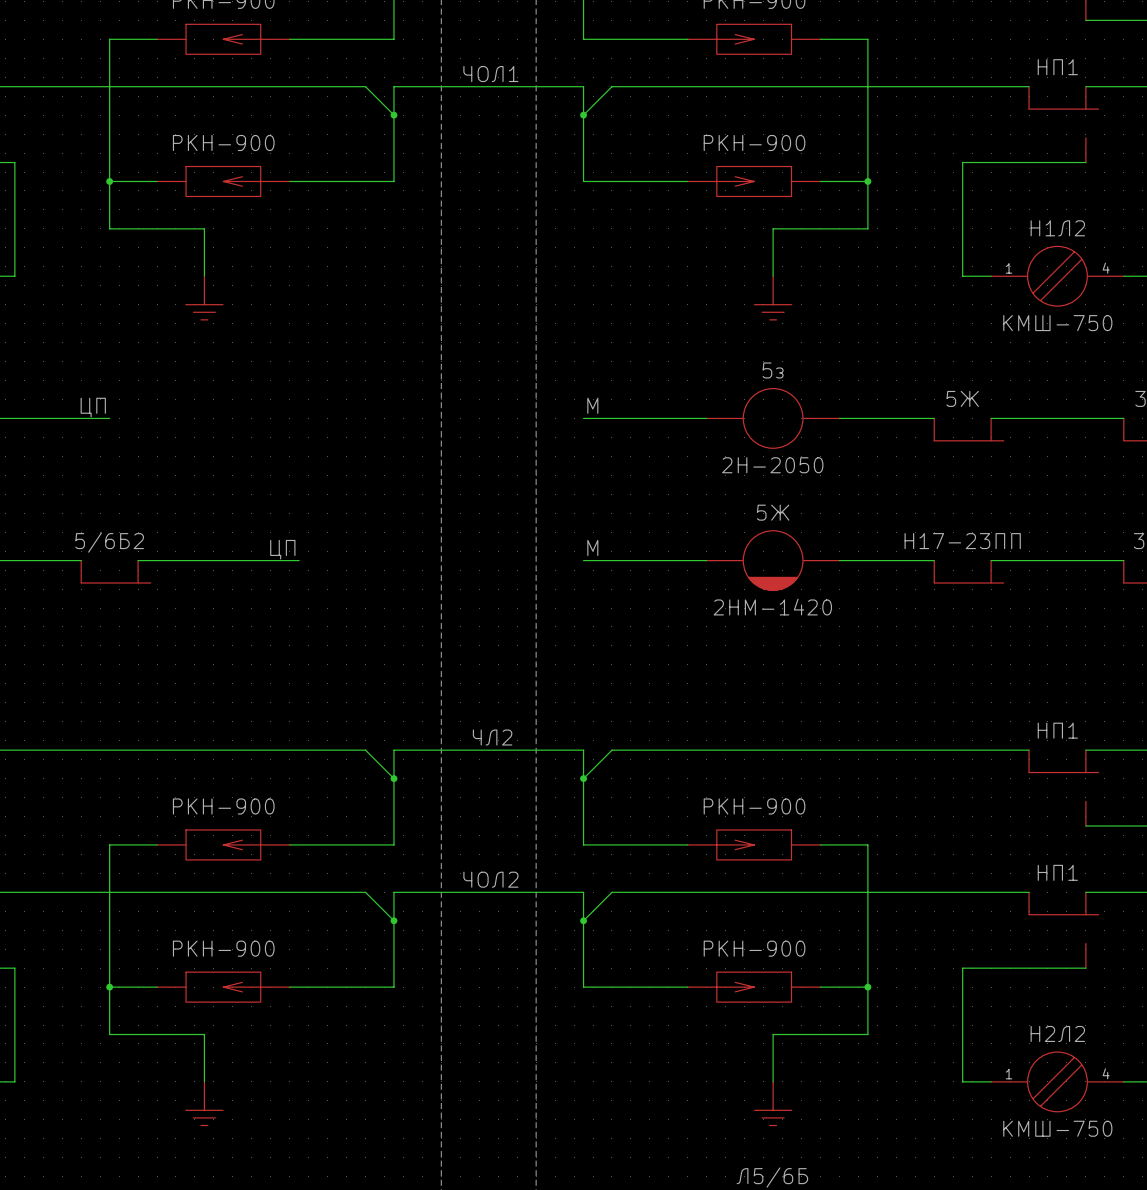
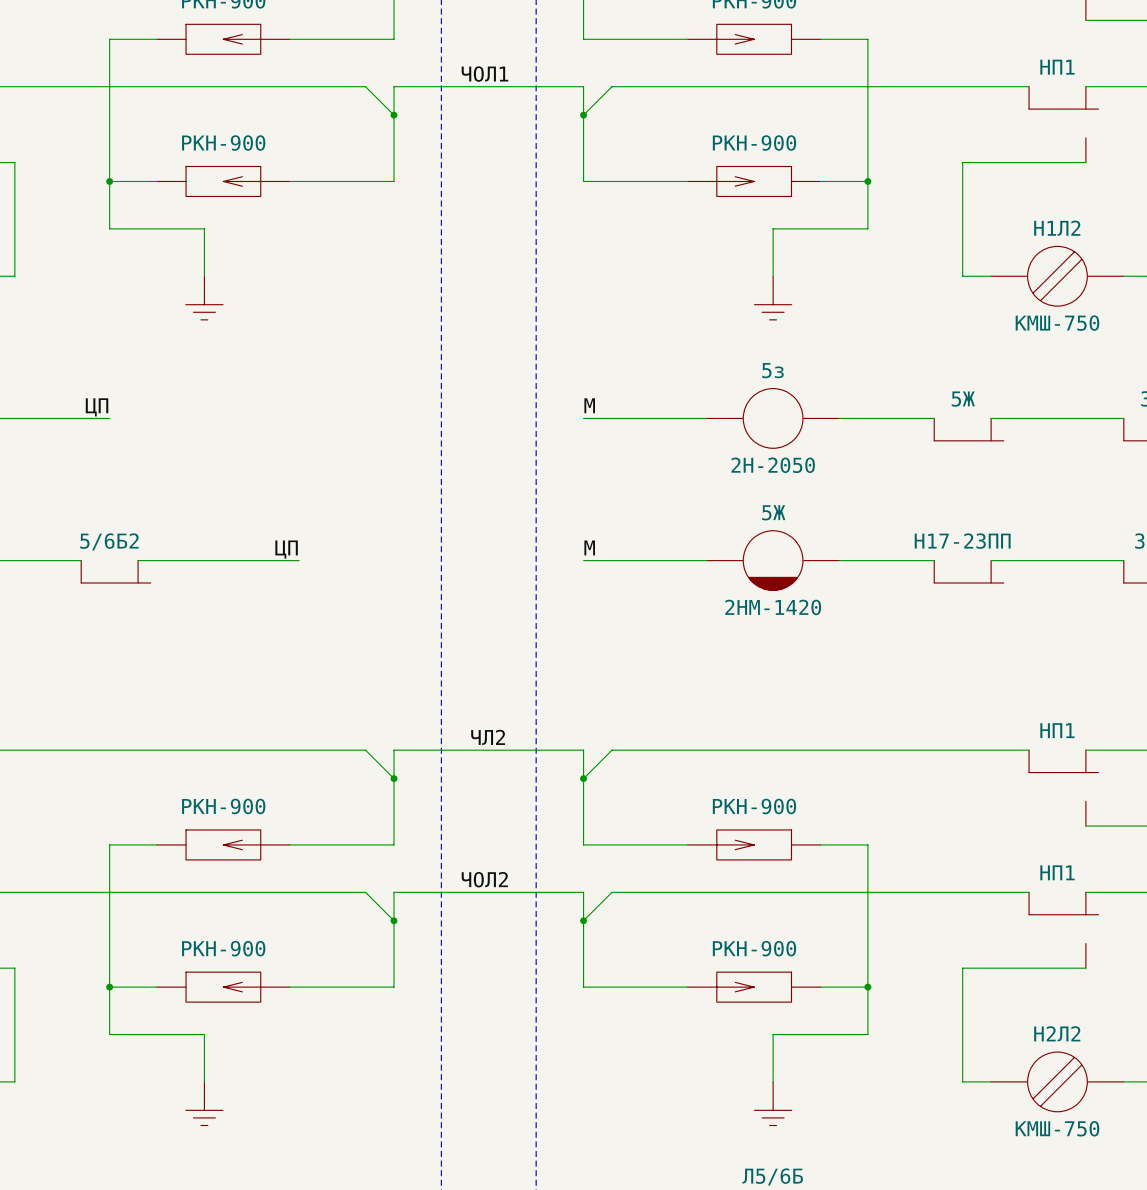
part pin number: 1 (1009, 268) -> none
part pin number: 4 (1106, 268) -> none
part pin number: 4 (1106, 1073) -> none
part pin number: 1 (1009, 1074) -> none

